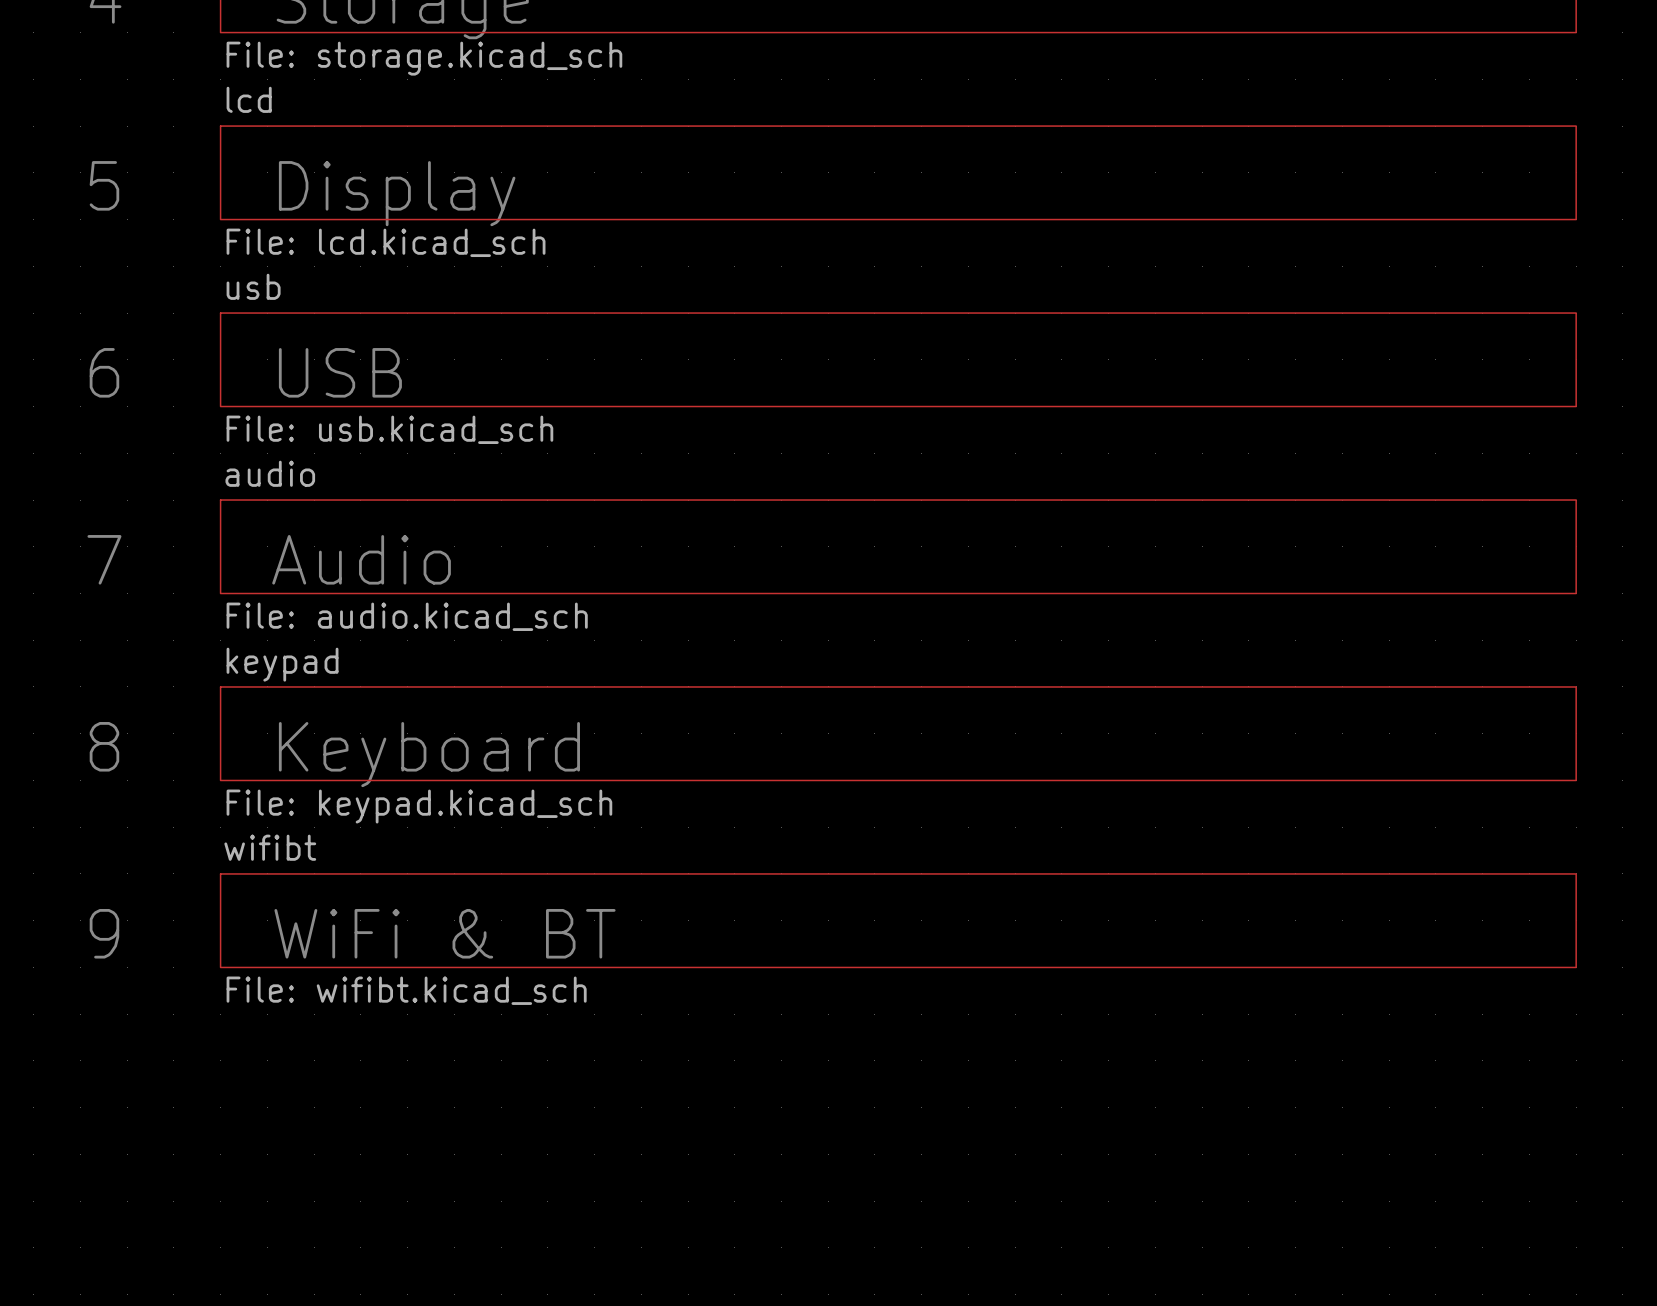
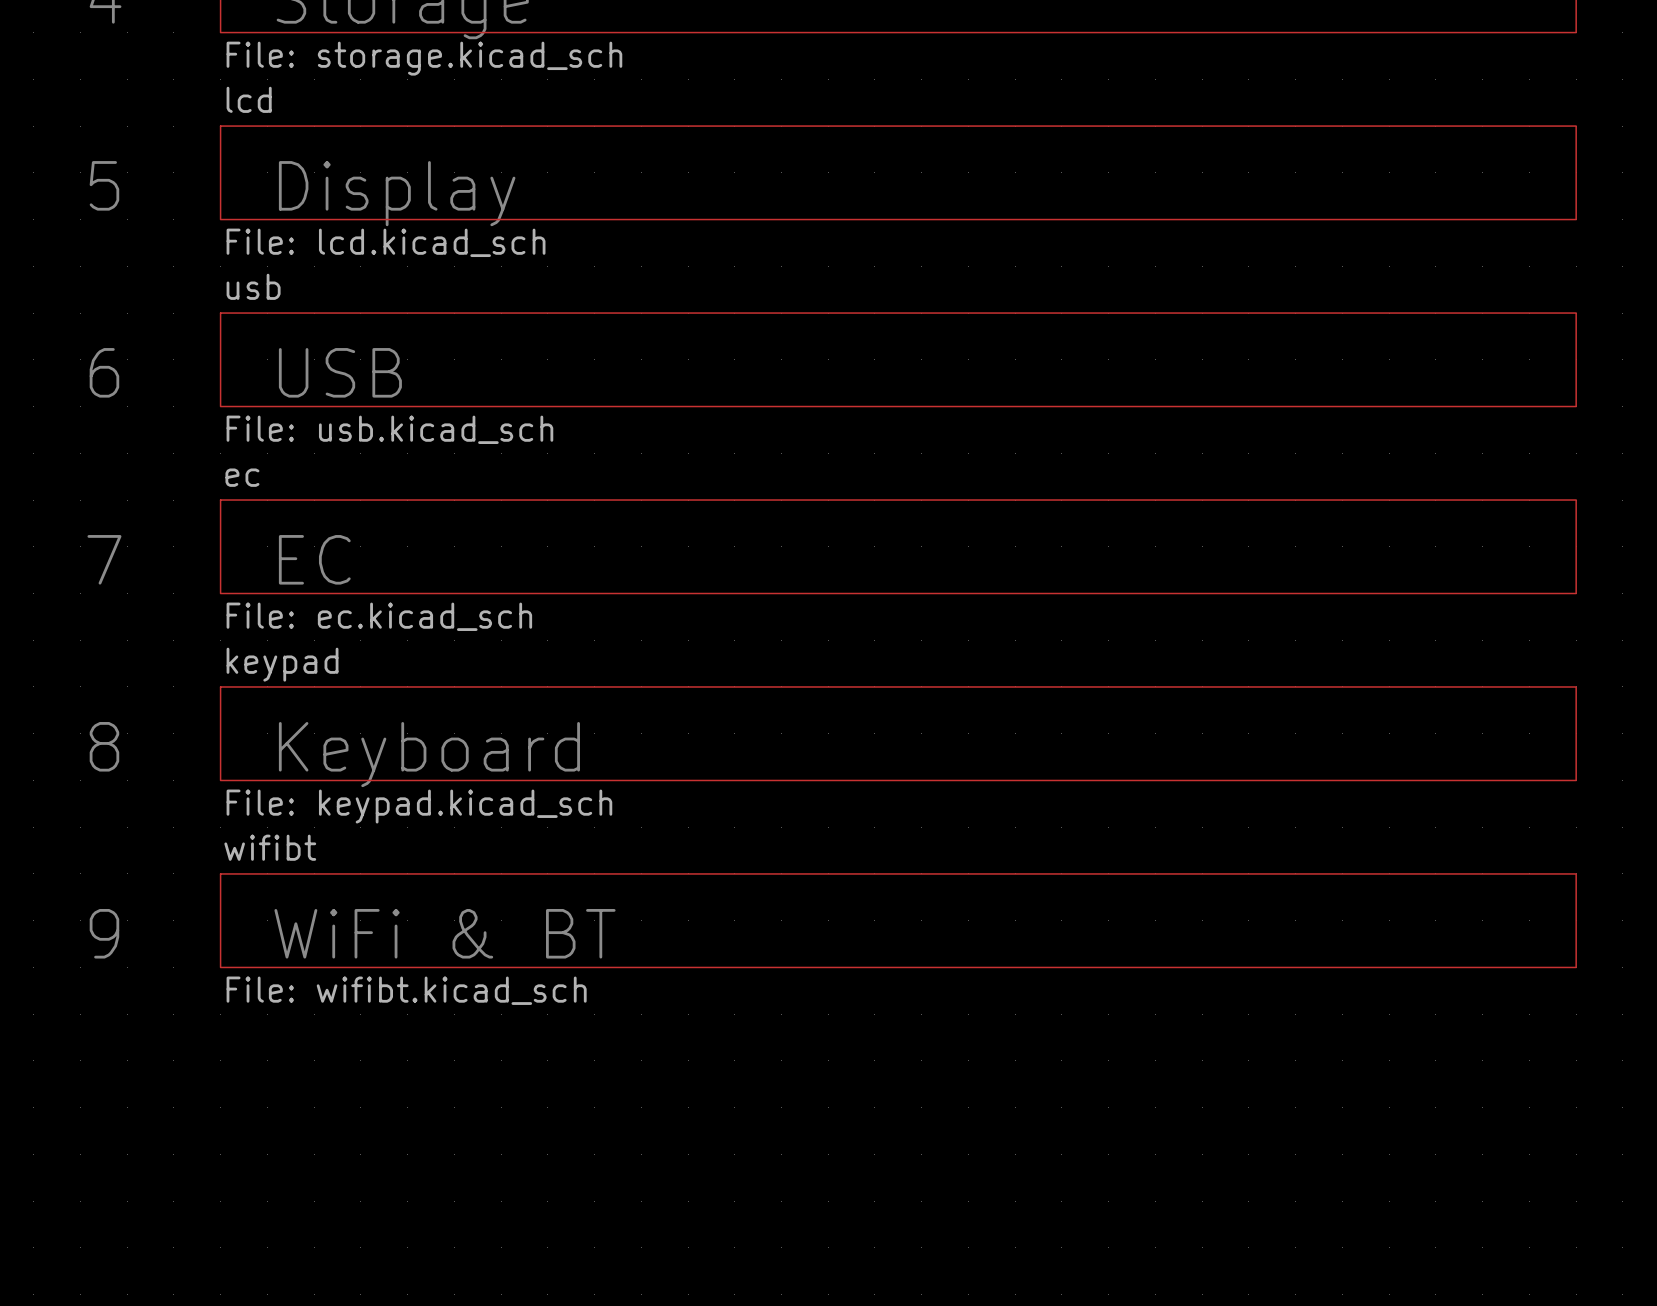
sheet audio name: audio (270, 473) -> ec (242, 477)
text: Audio (361, 559) -> EC (314, 559)
sheet audio value: File: audio.kicad_sch (407, 616) -> File: ec.kicad_sch (379, 616)

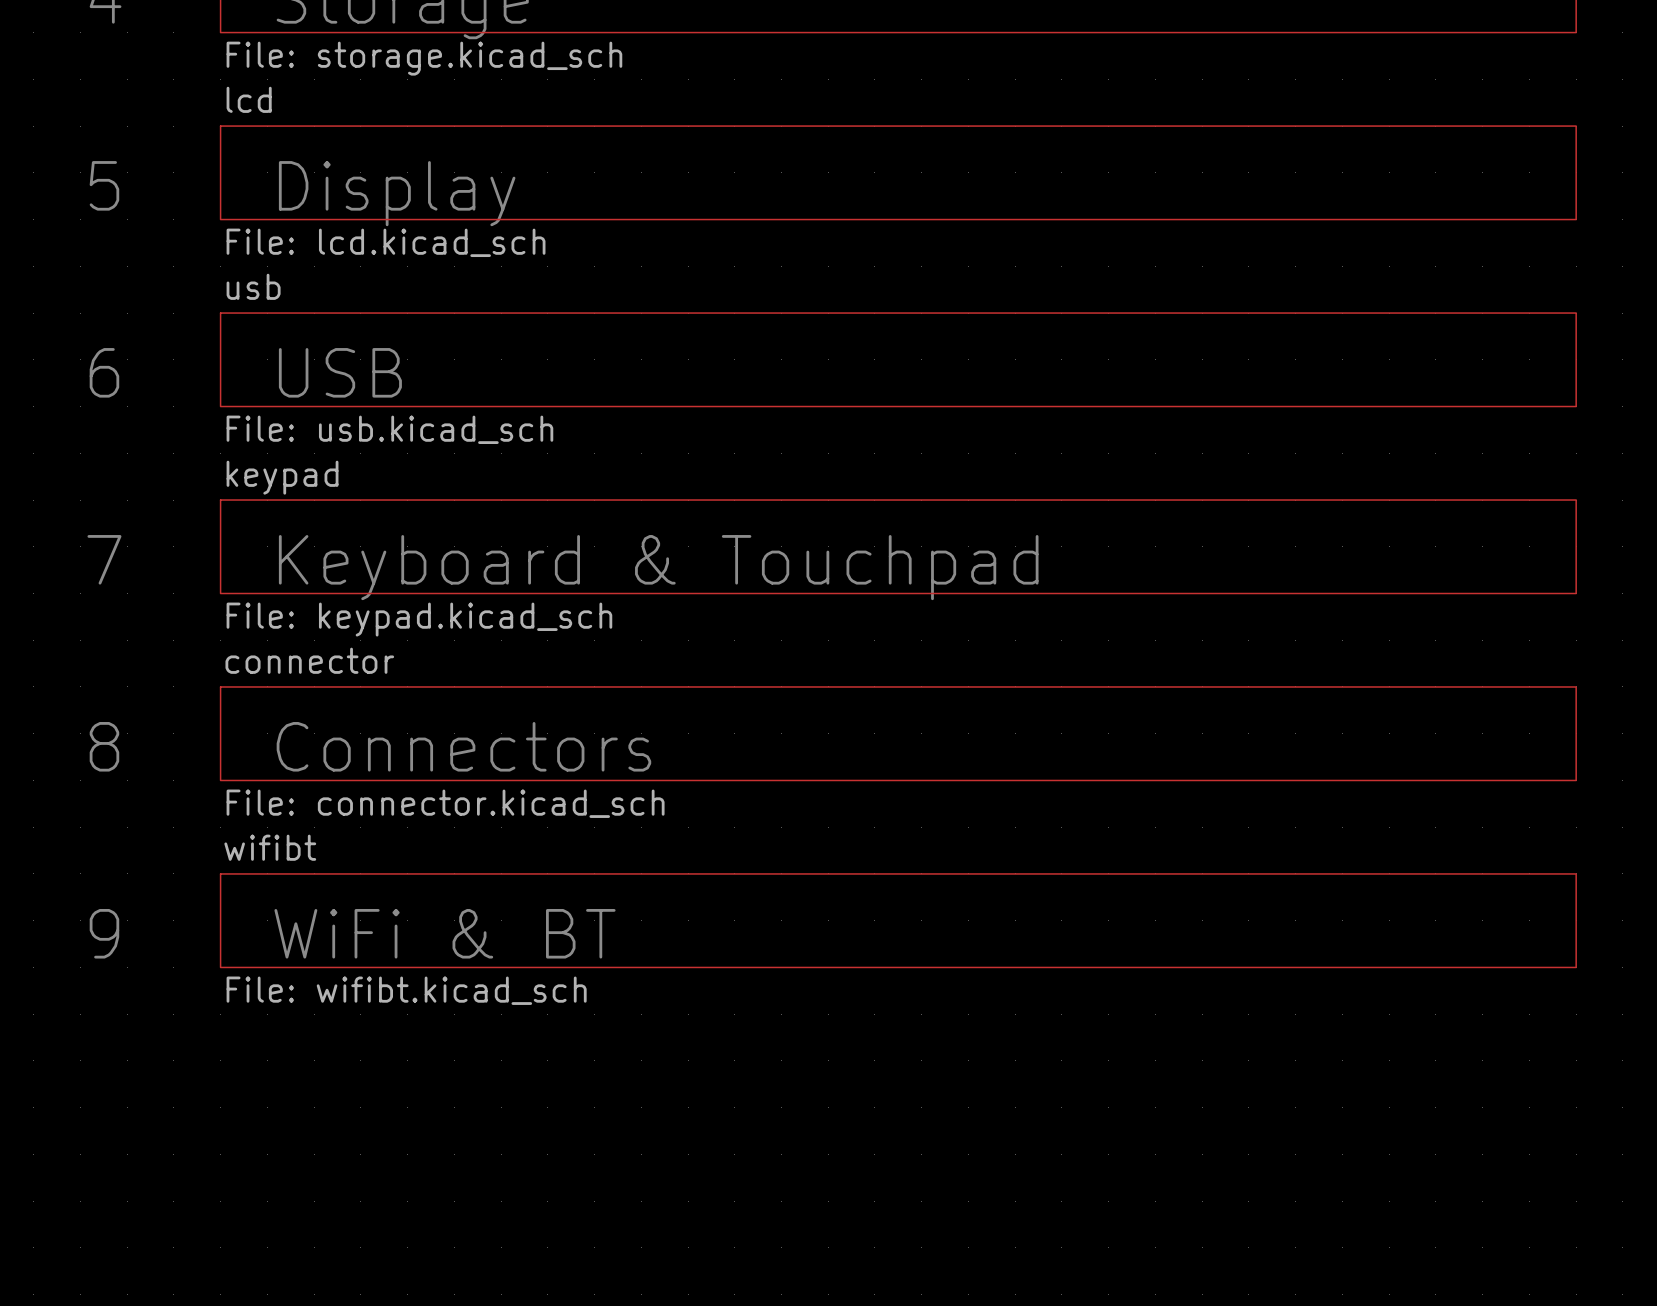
sheet ec name: ec (242, 477) -> keypad (282, 477)
text: EC (314, 559) -> Keyboard & Touchpad (658, 567)
sheet ec value: File: ec.kicad_sch (379, 616) -> File: keypad.kicad_sch (419, 619)
sheet keypad name: keypad (282, 664) -> connector (309, 660)
text: Keyboard (429, 754) -> Connectors (463, 746)
sheet keypad value: File: keypad.kicad_sch (419, 806) -> File: connector.kicad_sch (445, 803)

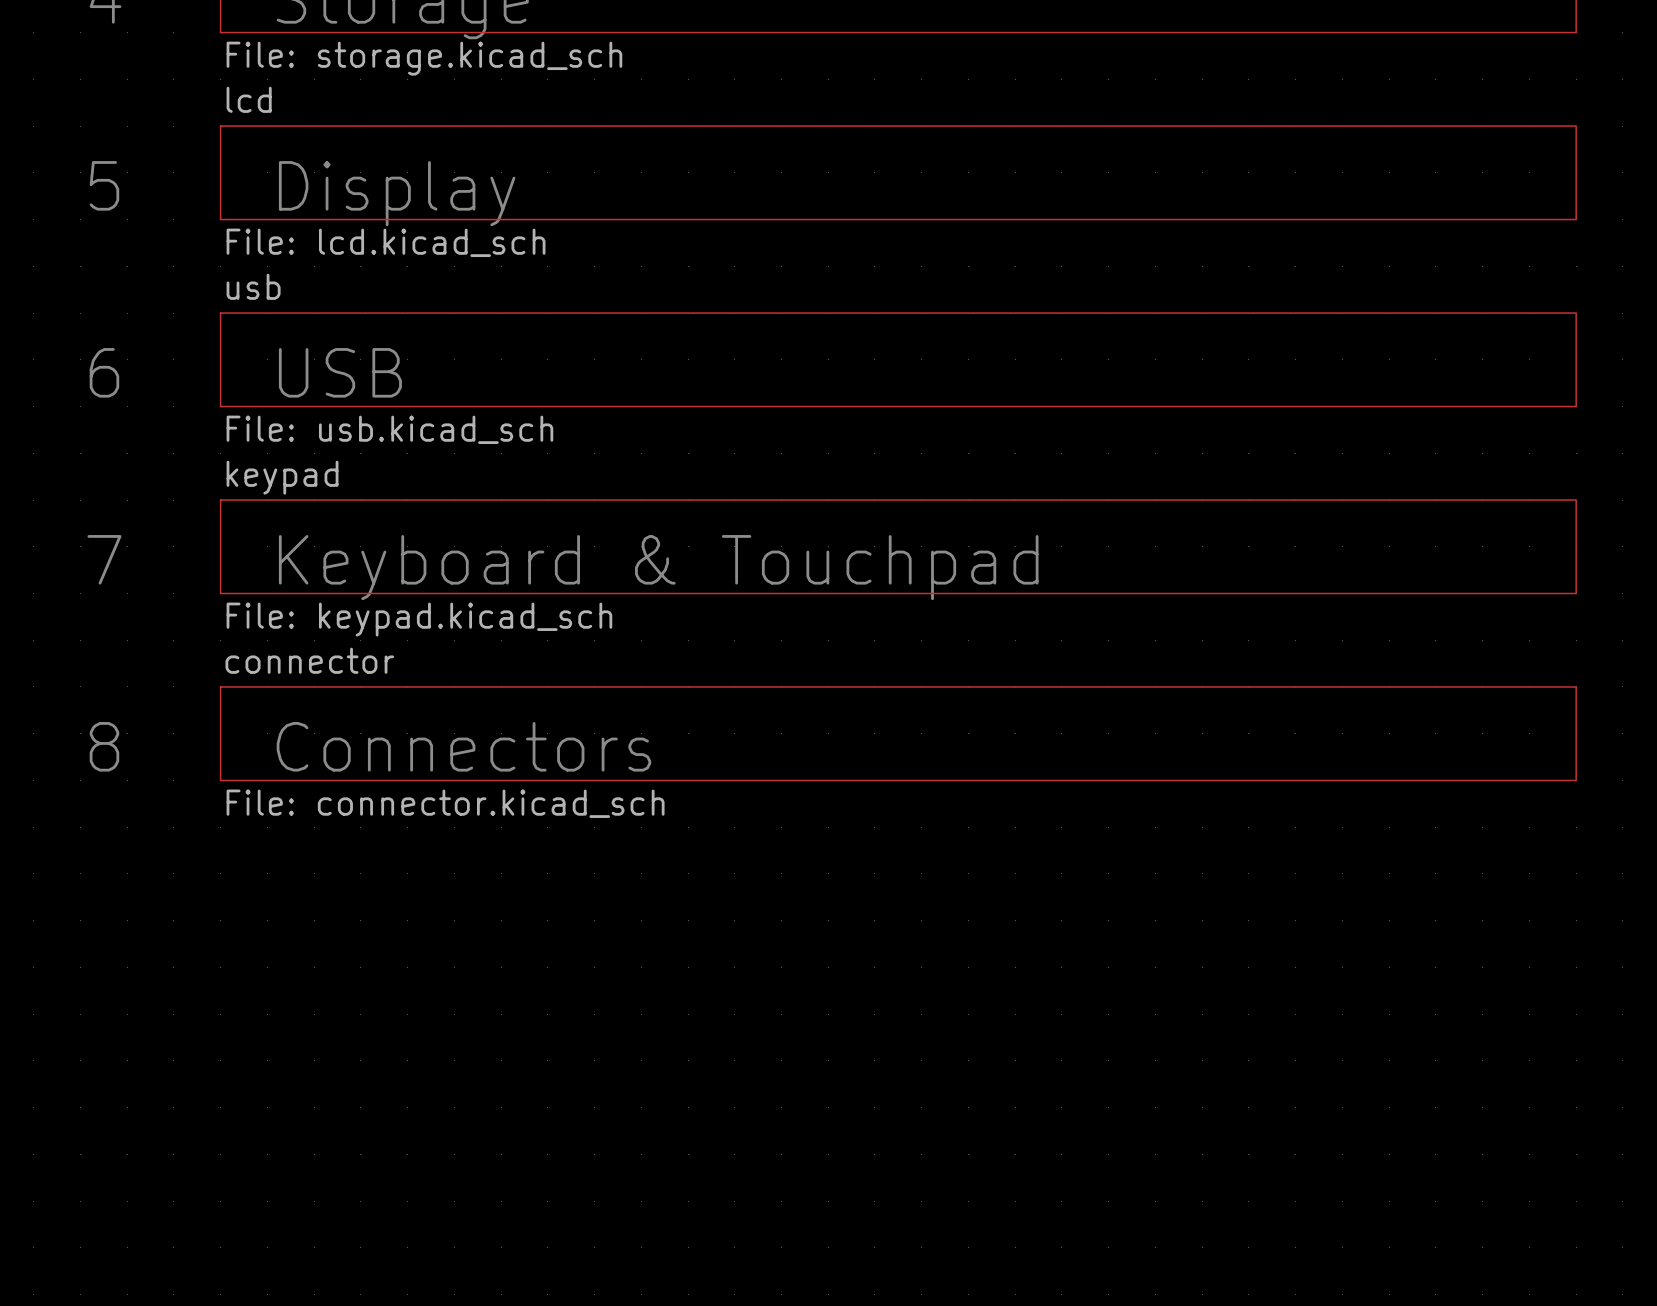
sheet wifibt: File: wifibt.kicad_sch (898, 920) -> none
text: 9 (104, 933) -> none
text: WiFi & BT (445, 933) -> none

